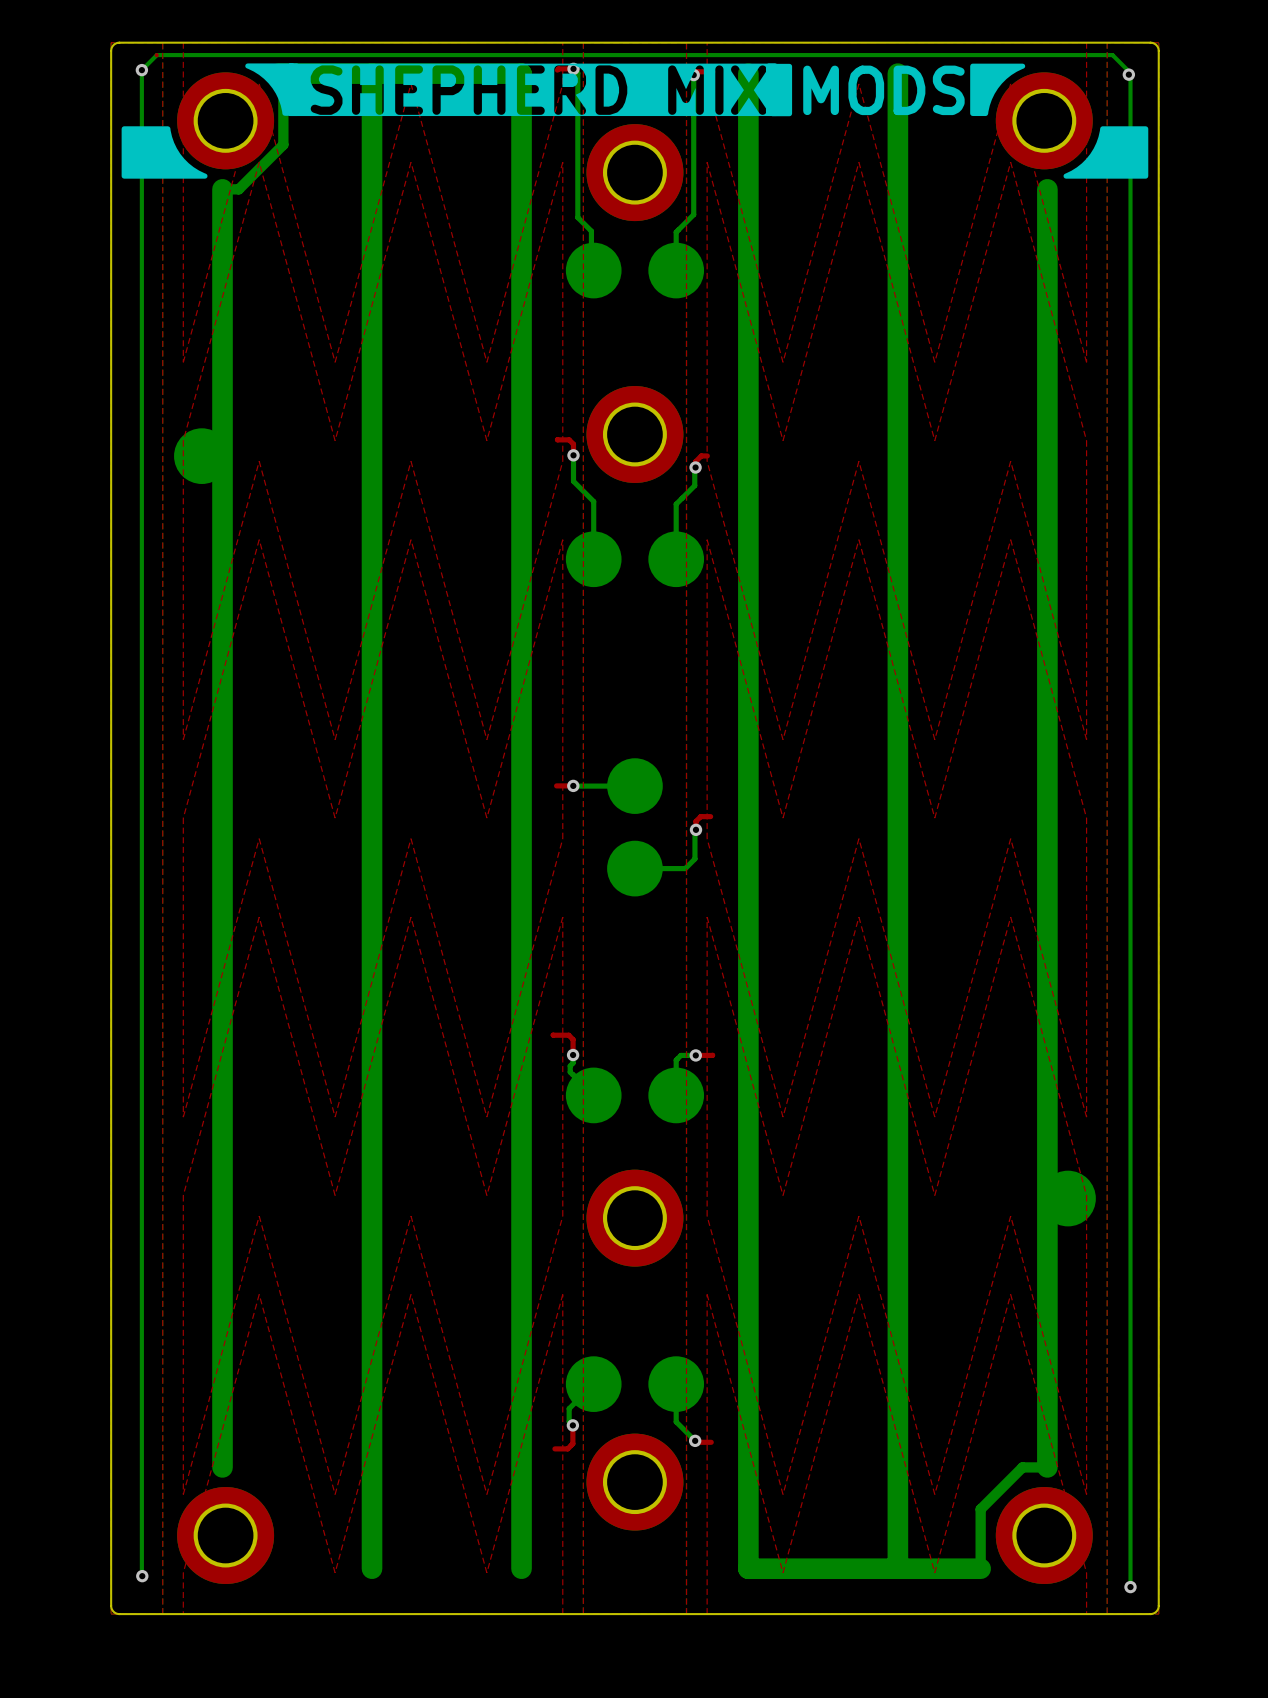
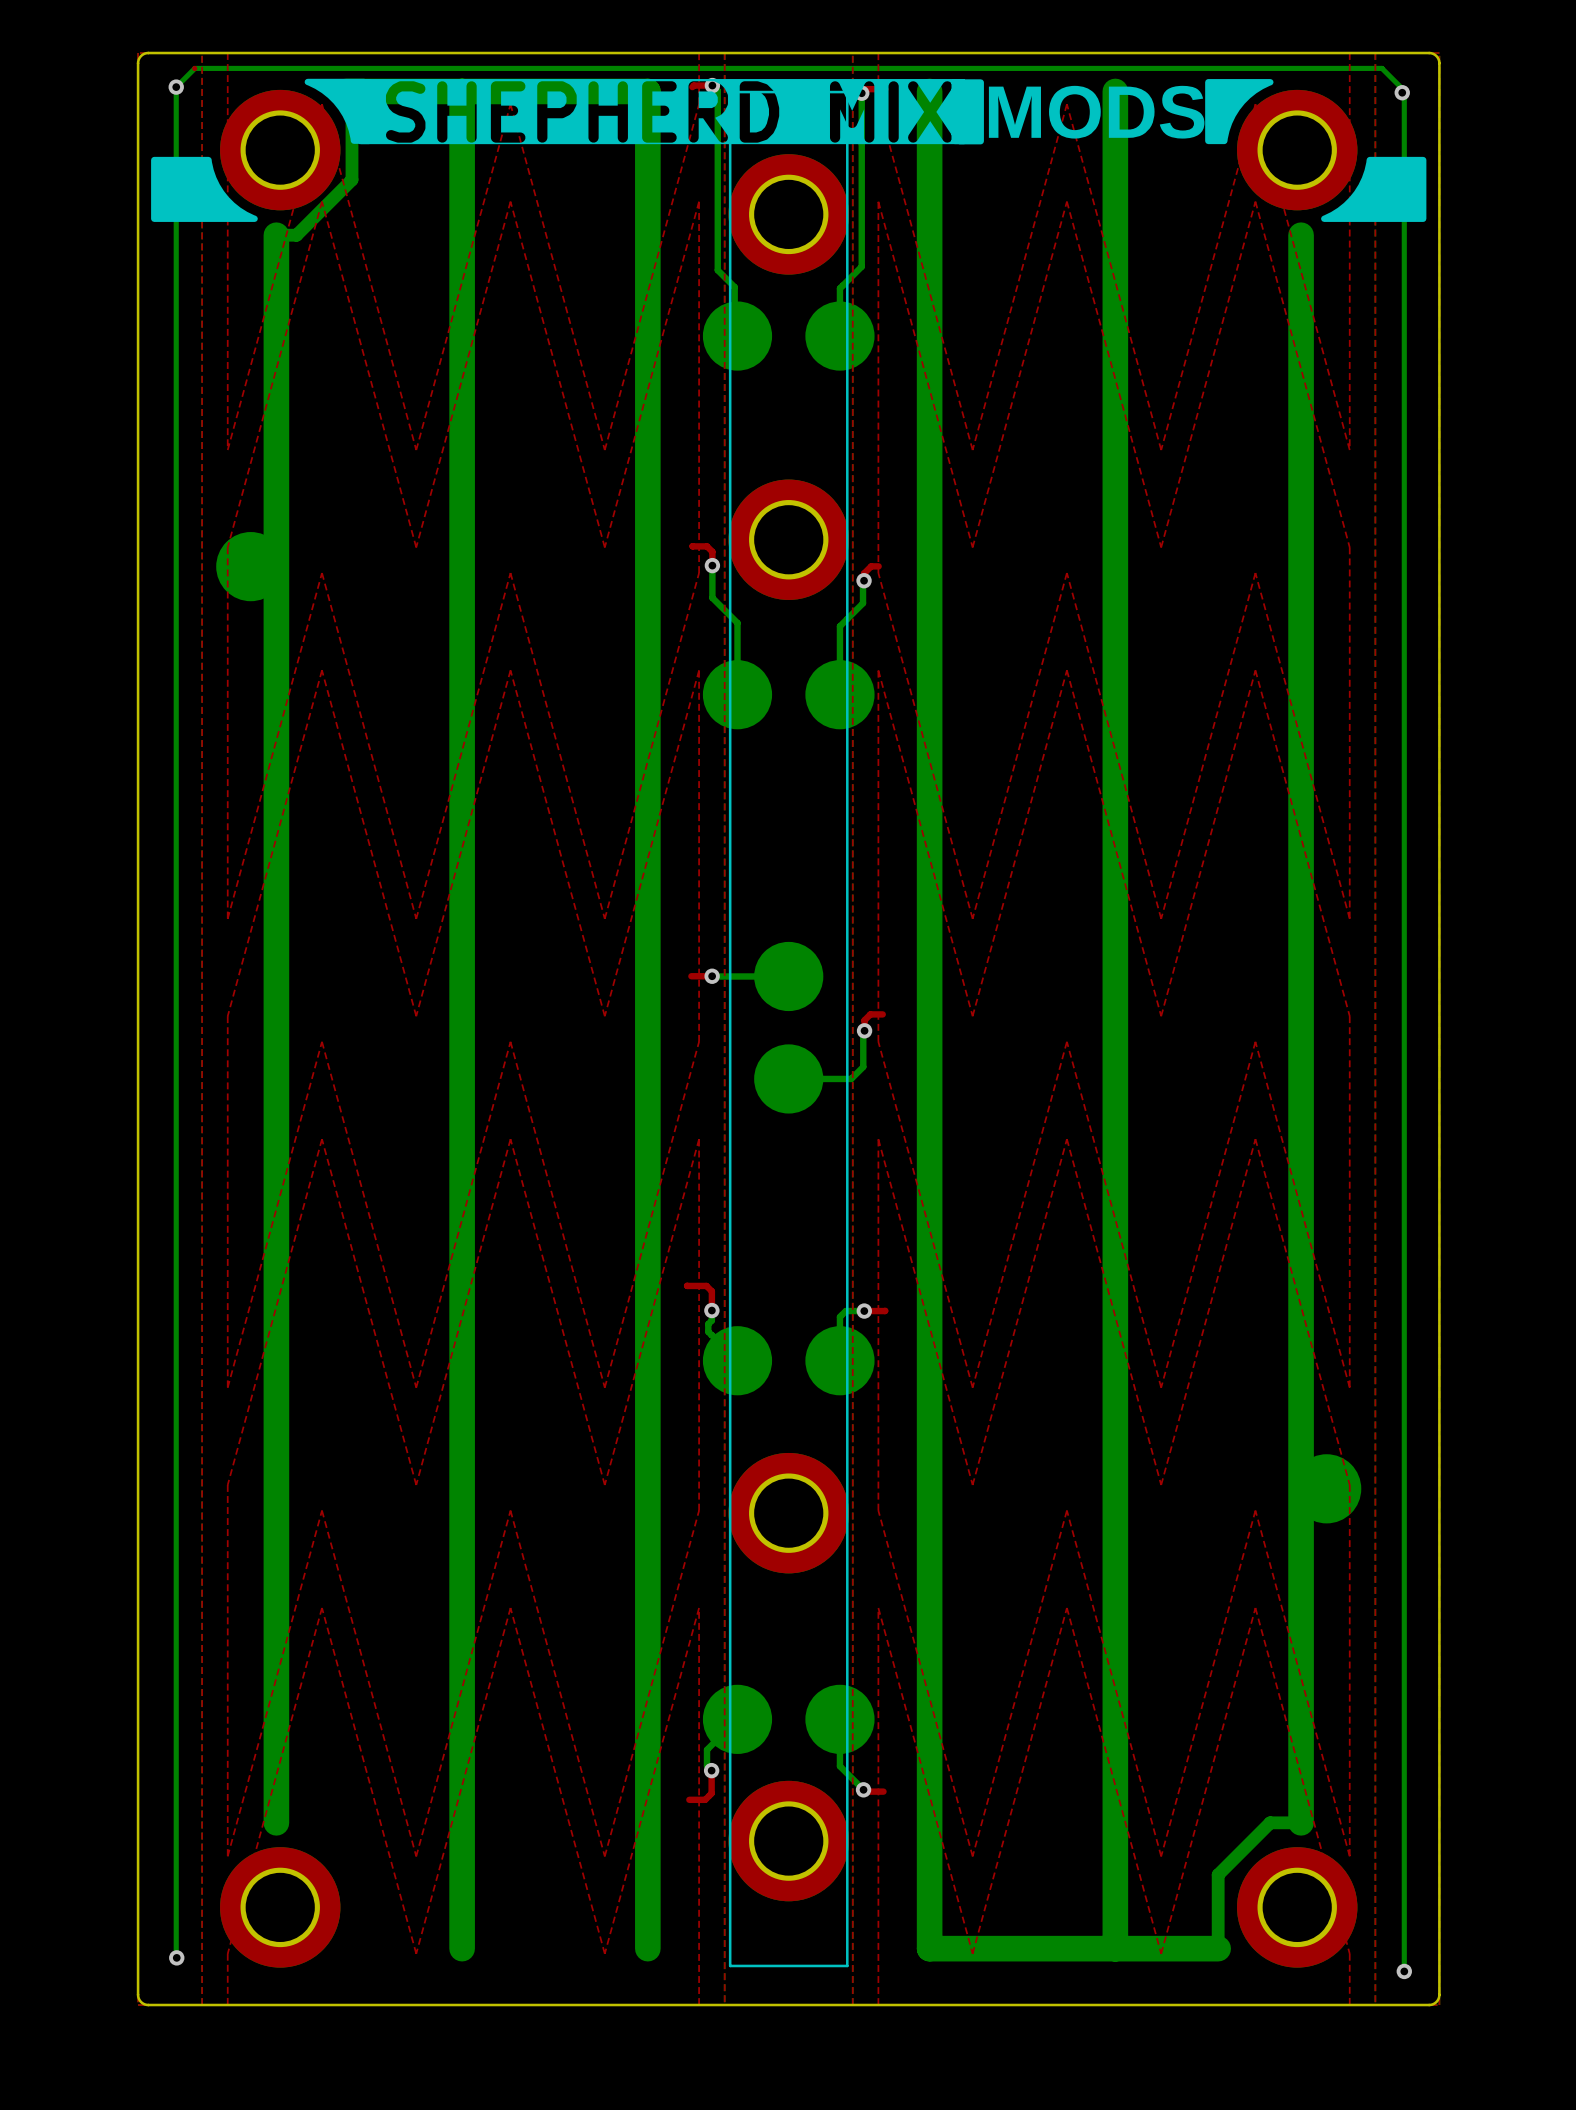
line: none -> (730, 92) (847, 92) (847, 1965) (730, 1965) (730, 92)

